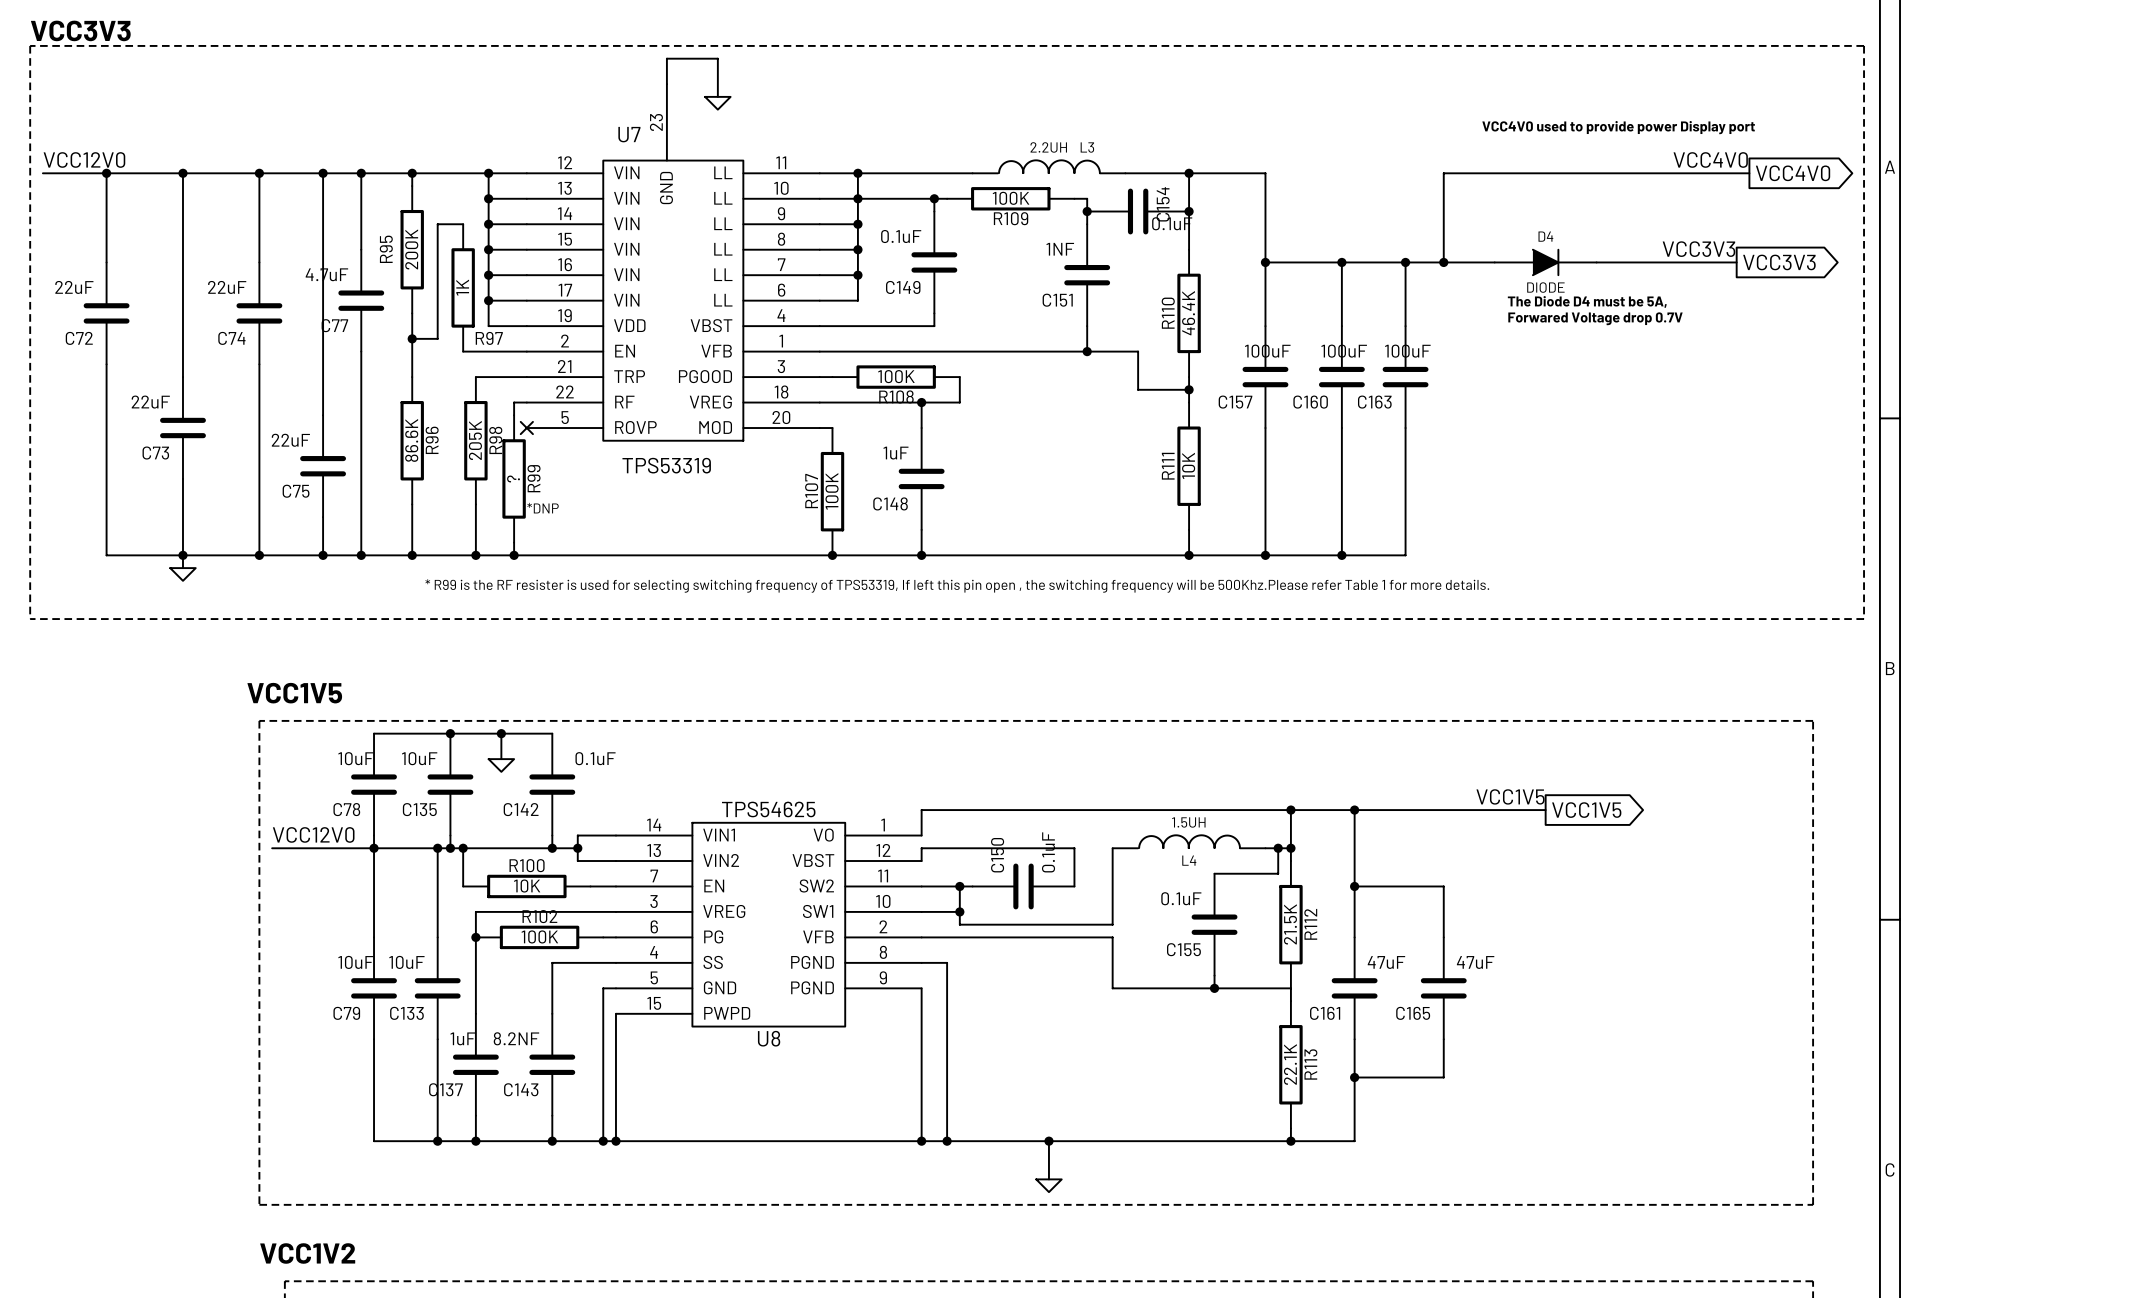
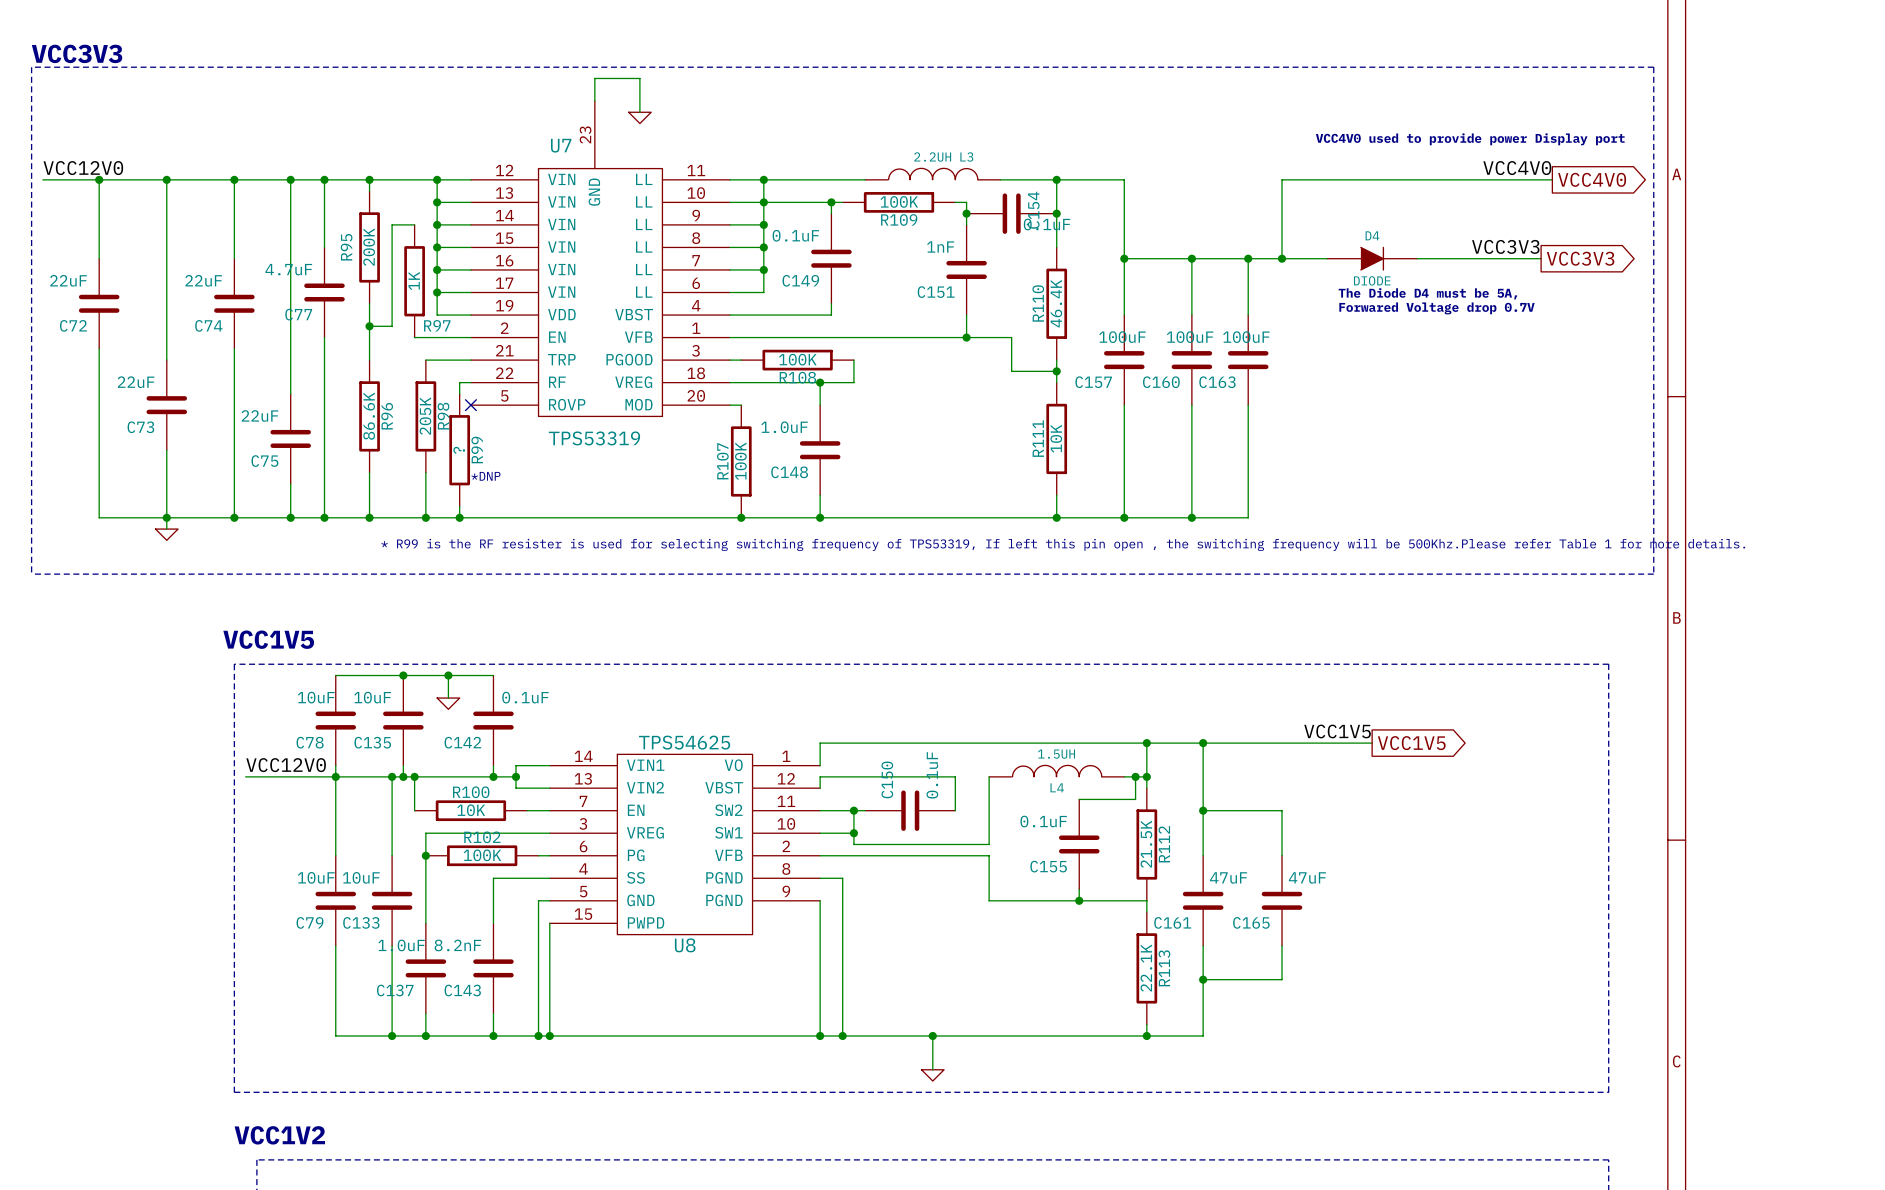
C151 value: 1NF (1060, 249) -> 1nF (940, 247)
C148 value: 1uF (895, 453) -> 1.0uF (784, 427)
C137 value: 1uF (463, 1038) -> 1.0uF (401, 945)
C143 value: 8.2NF (516, 1038) -> 8.2nF (457, 945)

